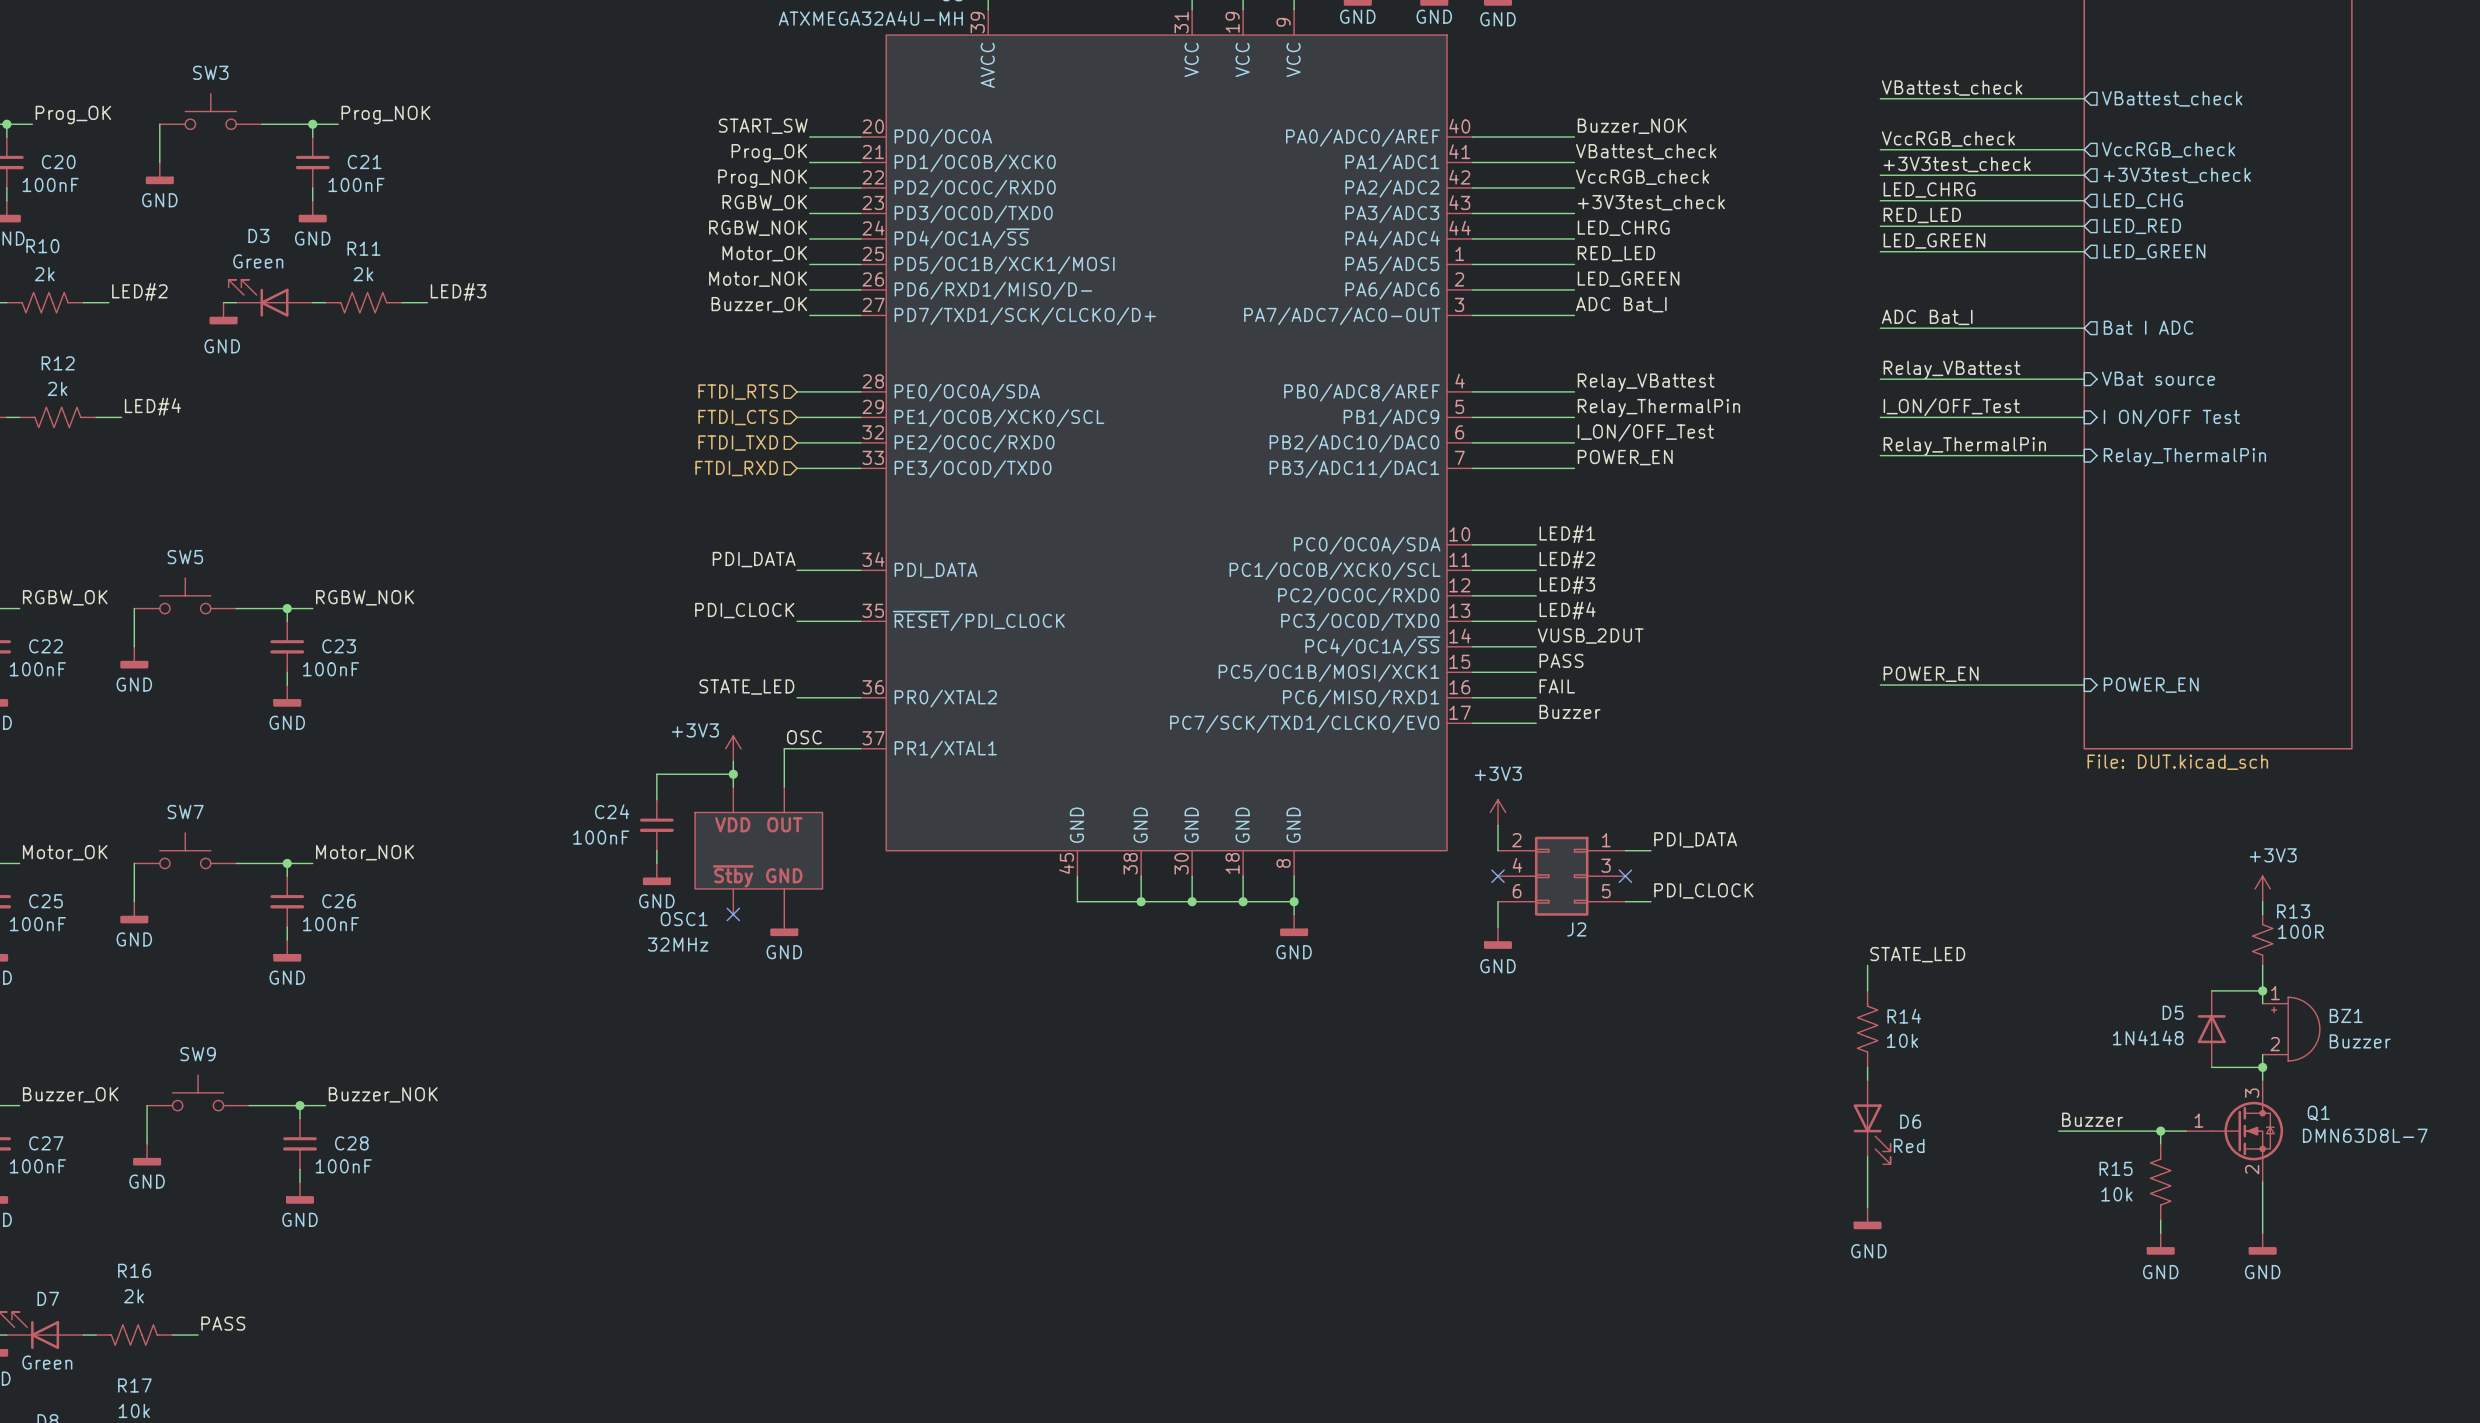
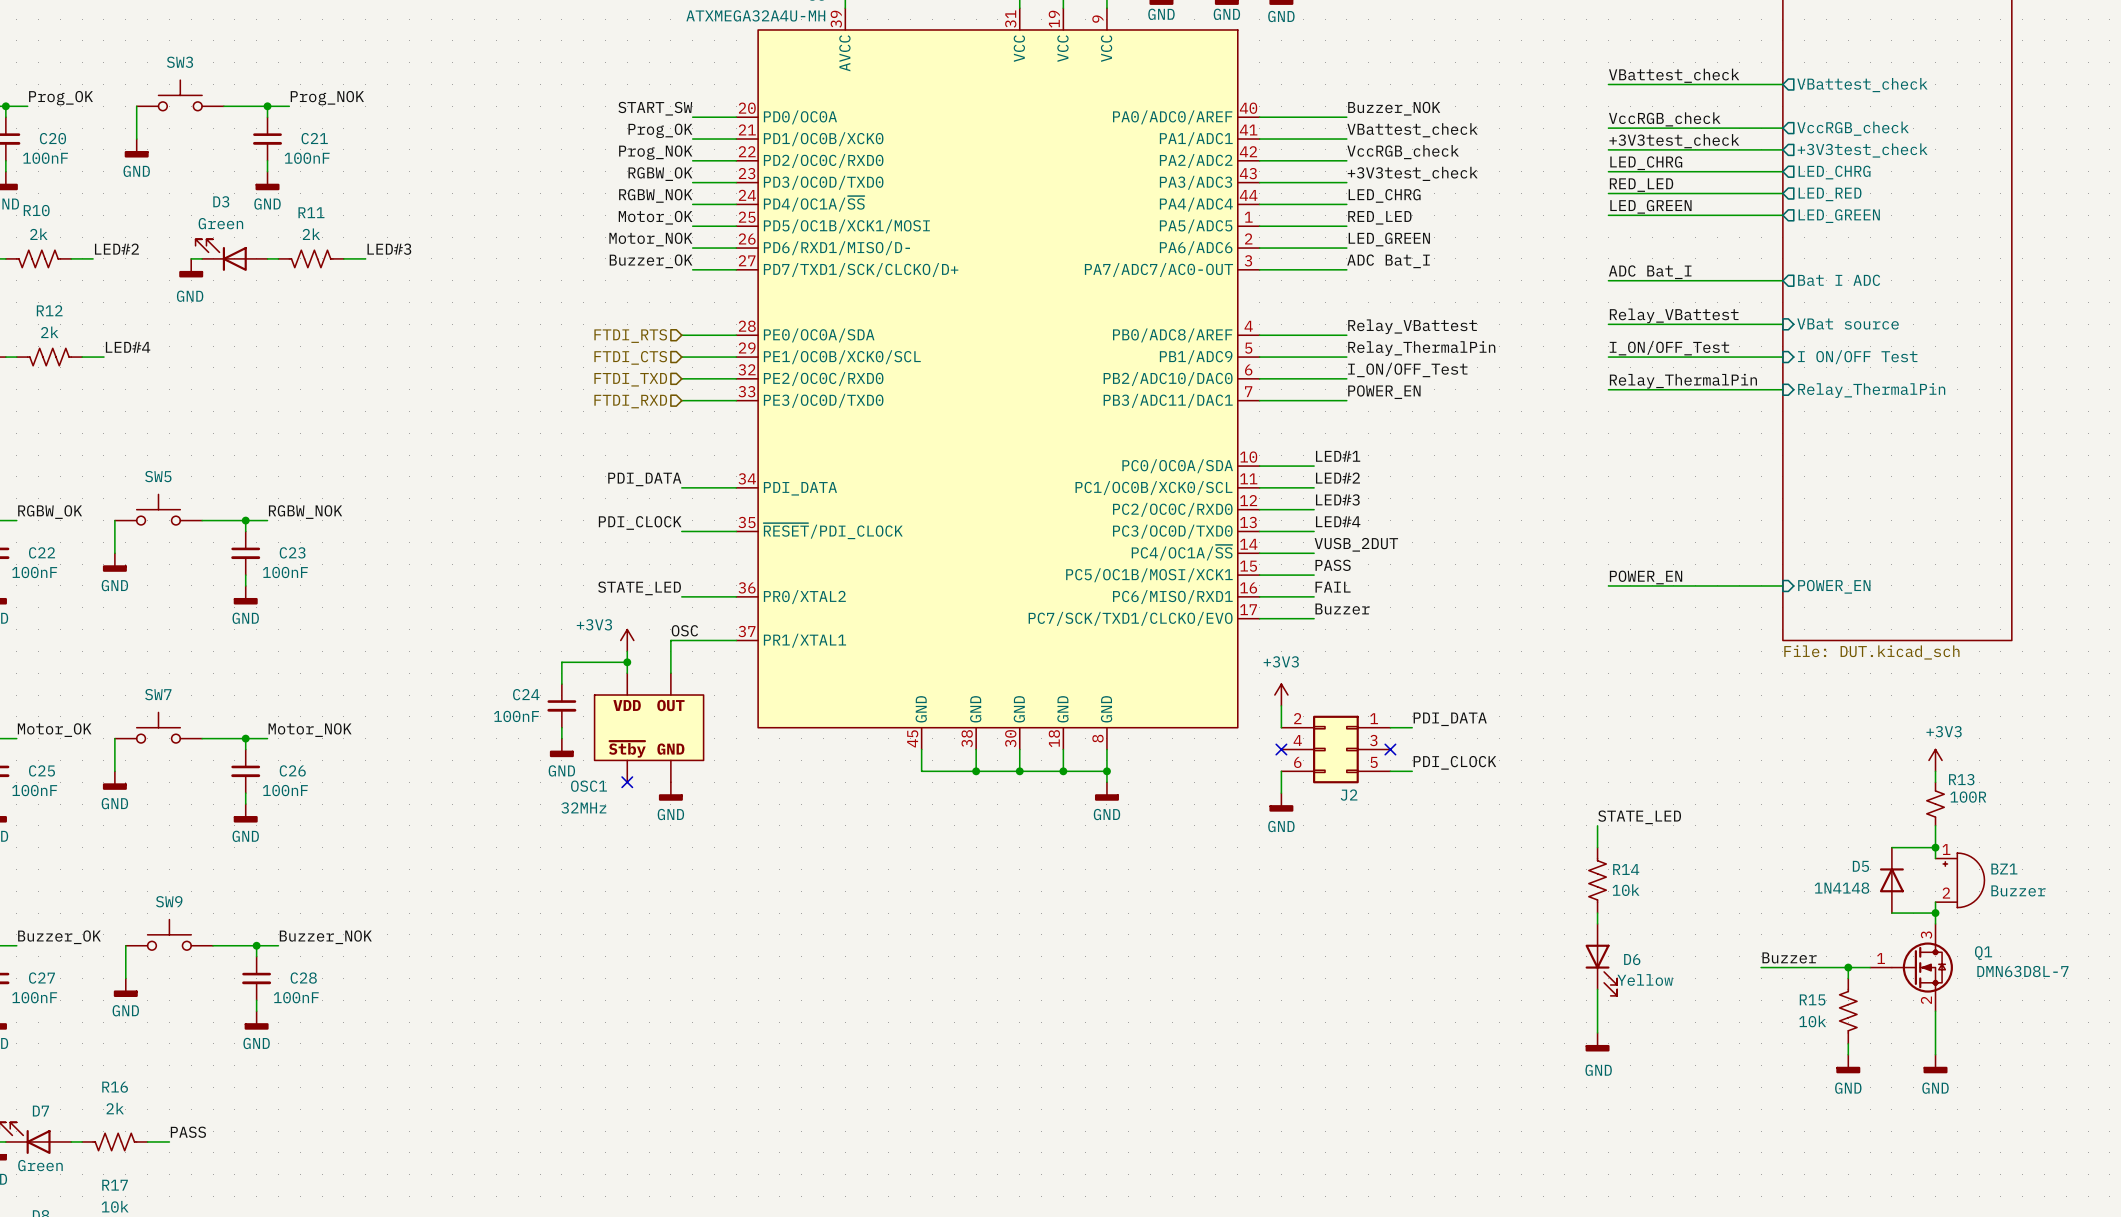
sheet pin: LED_CHG (2143, 200) -> LED_CHRG (1834, 172)
D6 value: Red (1909, 1145) -> Yellow (1645, 979)

